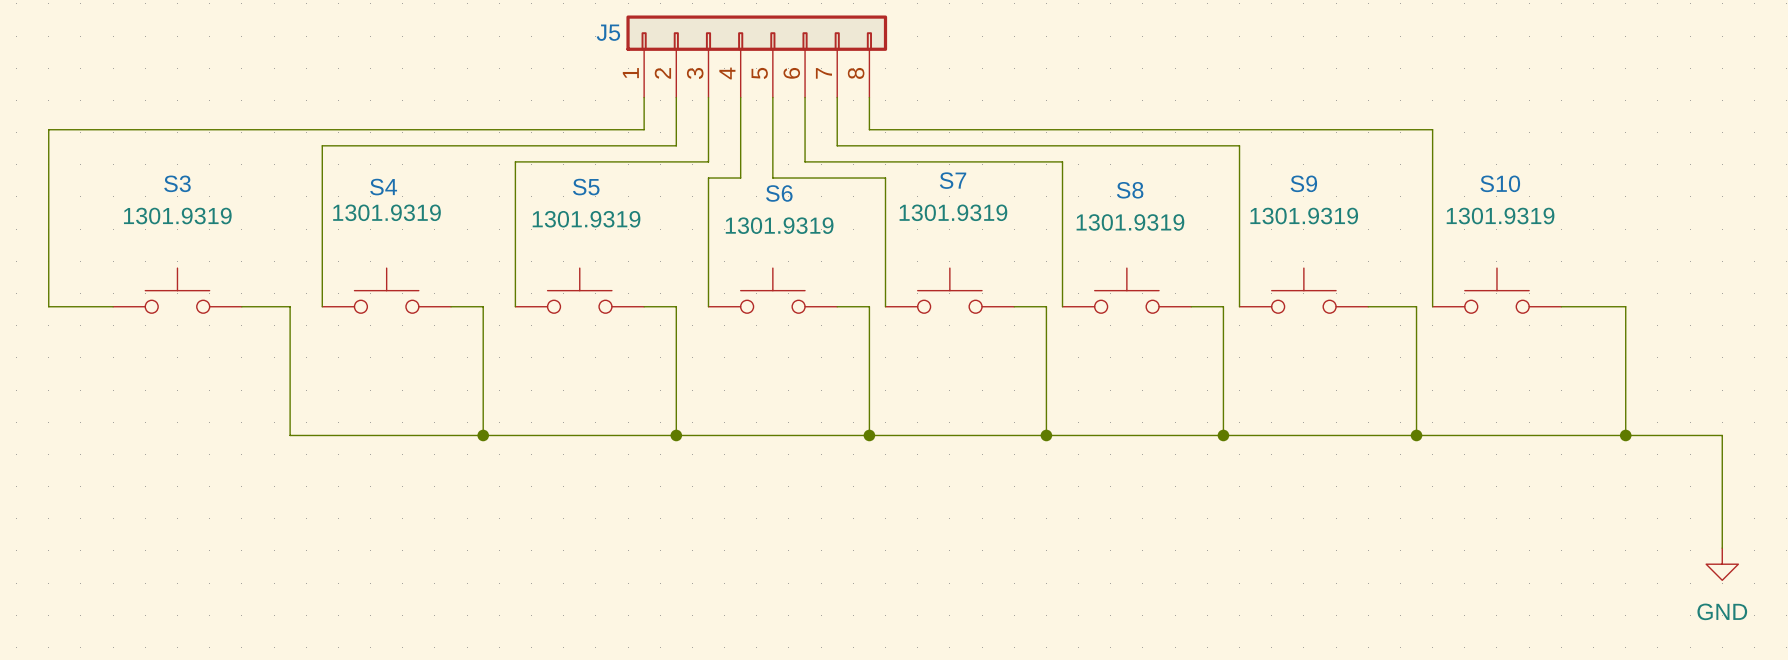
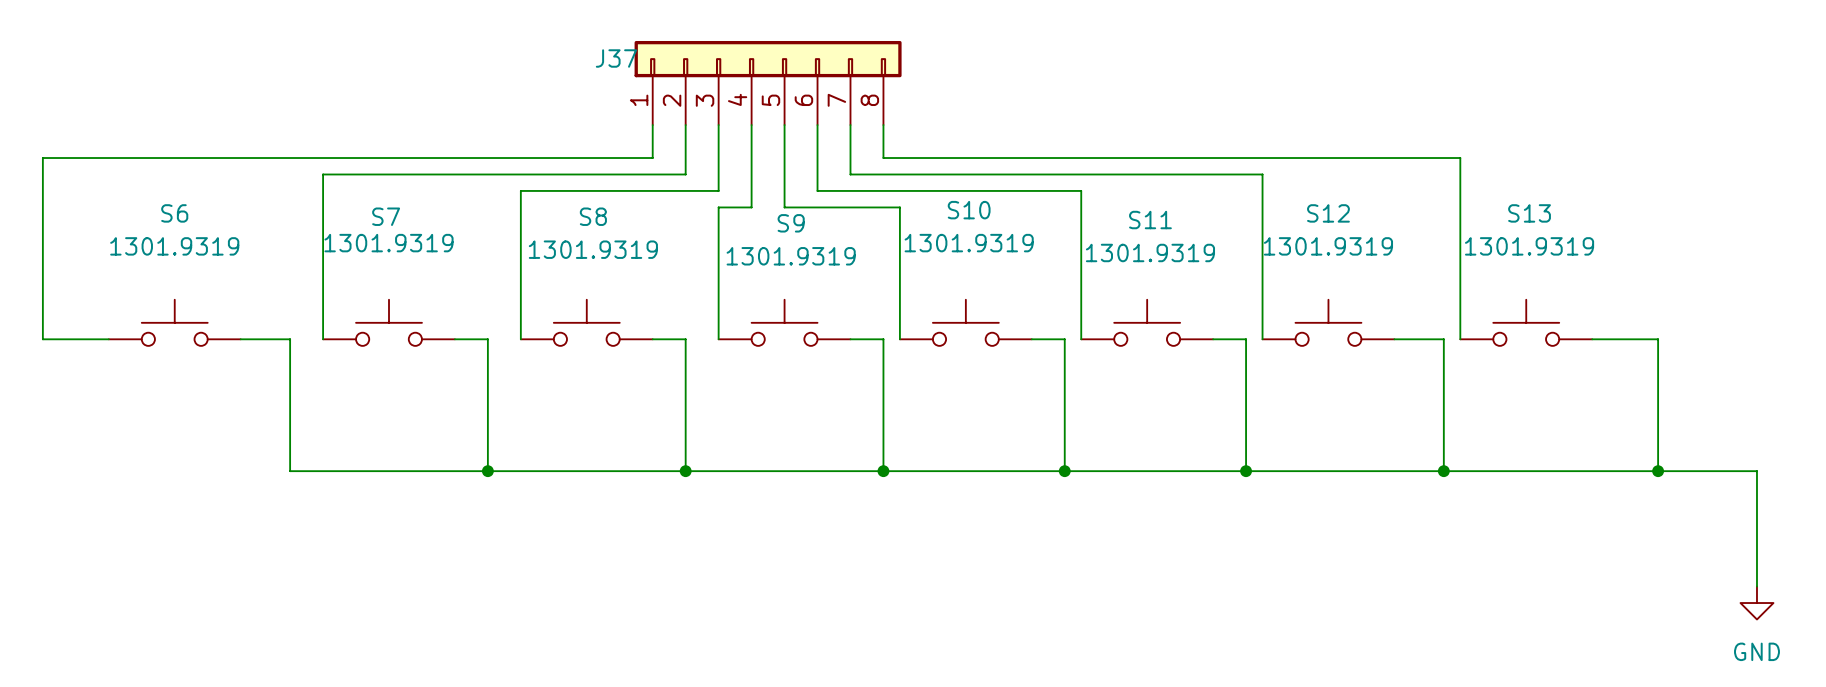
J5 name: J5 (608, 32) -> J37 (616, 58)
S7 name: S7 (953, 180) -> S10 (969, 210)
S3 name: S3 (177, 183) -> S6 (174, 213)
S9 name: S9 (1303, 183) -> S12 (1328, 213)
S10 name: S10 (1500, 183) -> S13 (1529, 213)
S4 name: S4 (383, 187) -> S7 (386, 216)
S5 name: S5 (586, 187) -> S8 (593, 216)
S8 name: S8 (1130, 190) -> S11 (1150, 220)
S6 name: S6 (779, 193) -> S9 (791, 223)

